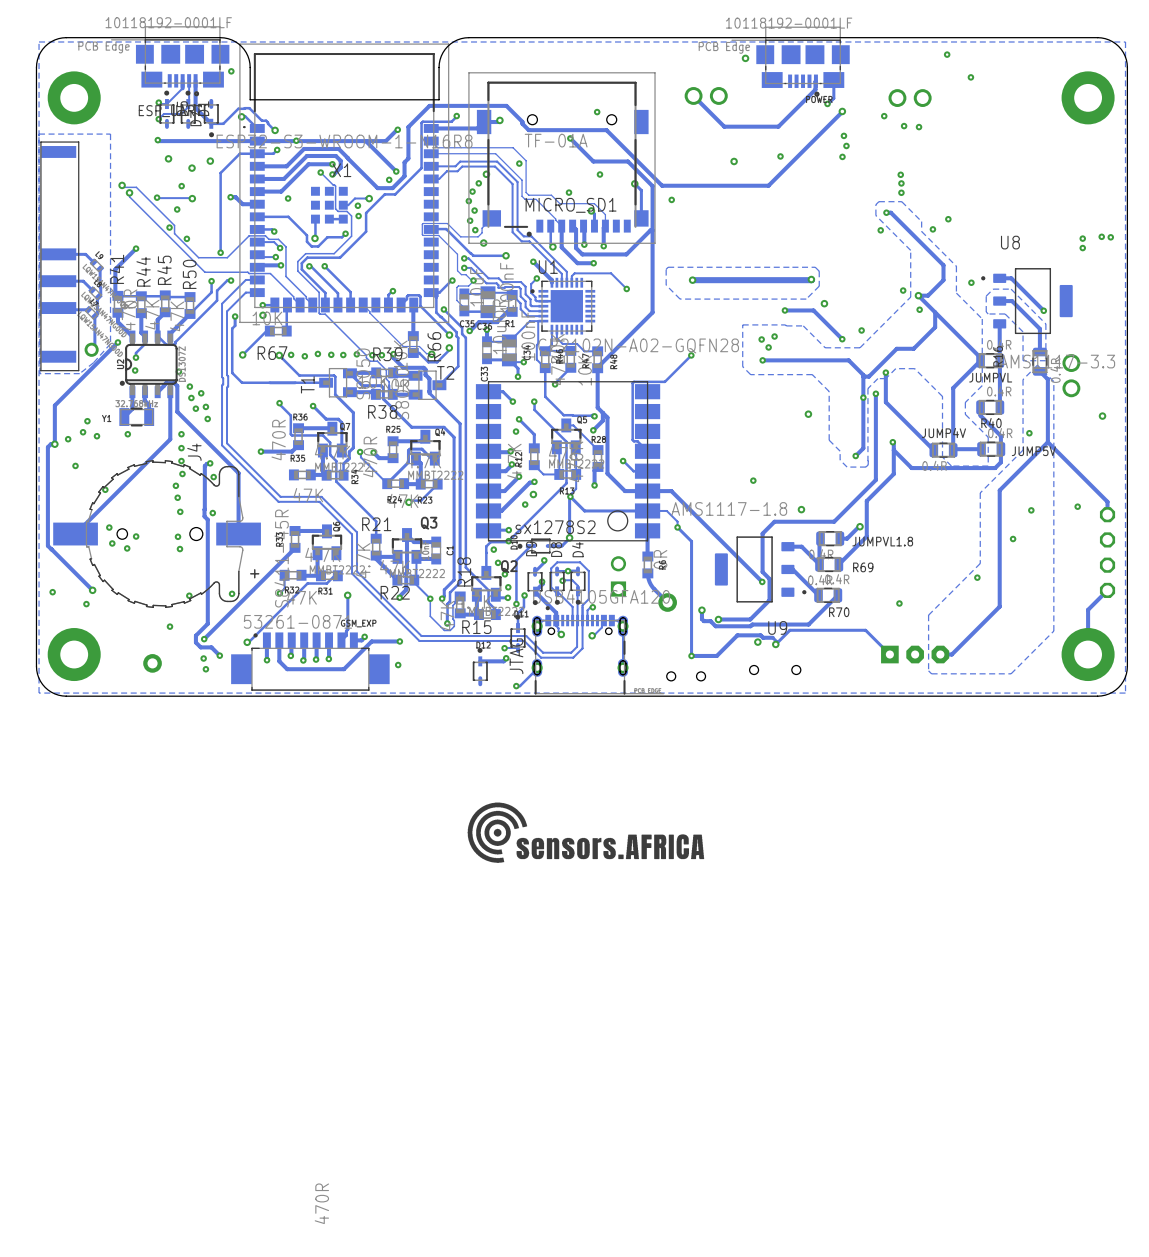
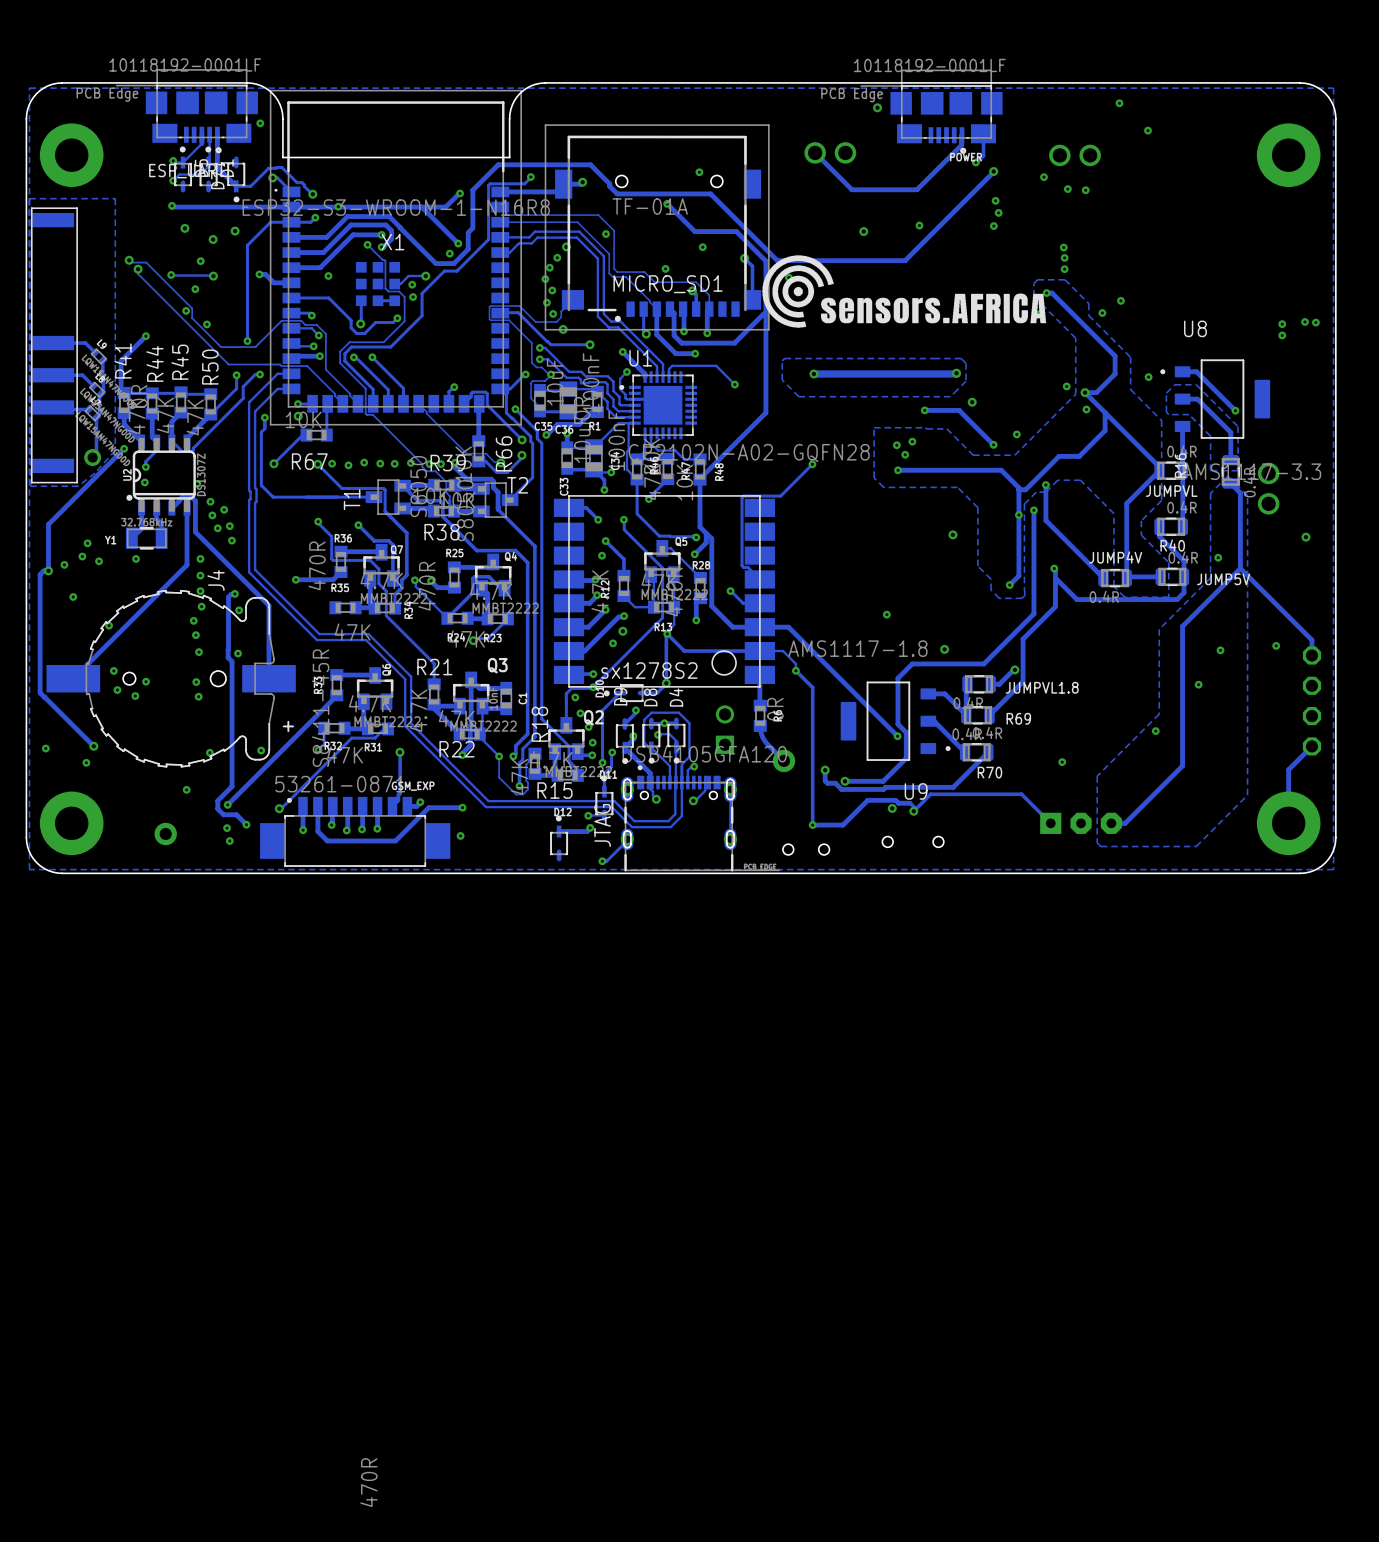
drawing: none -> [762, 255, 1047, 328]
drawing: [467, 802, 705, 863] -> none

